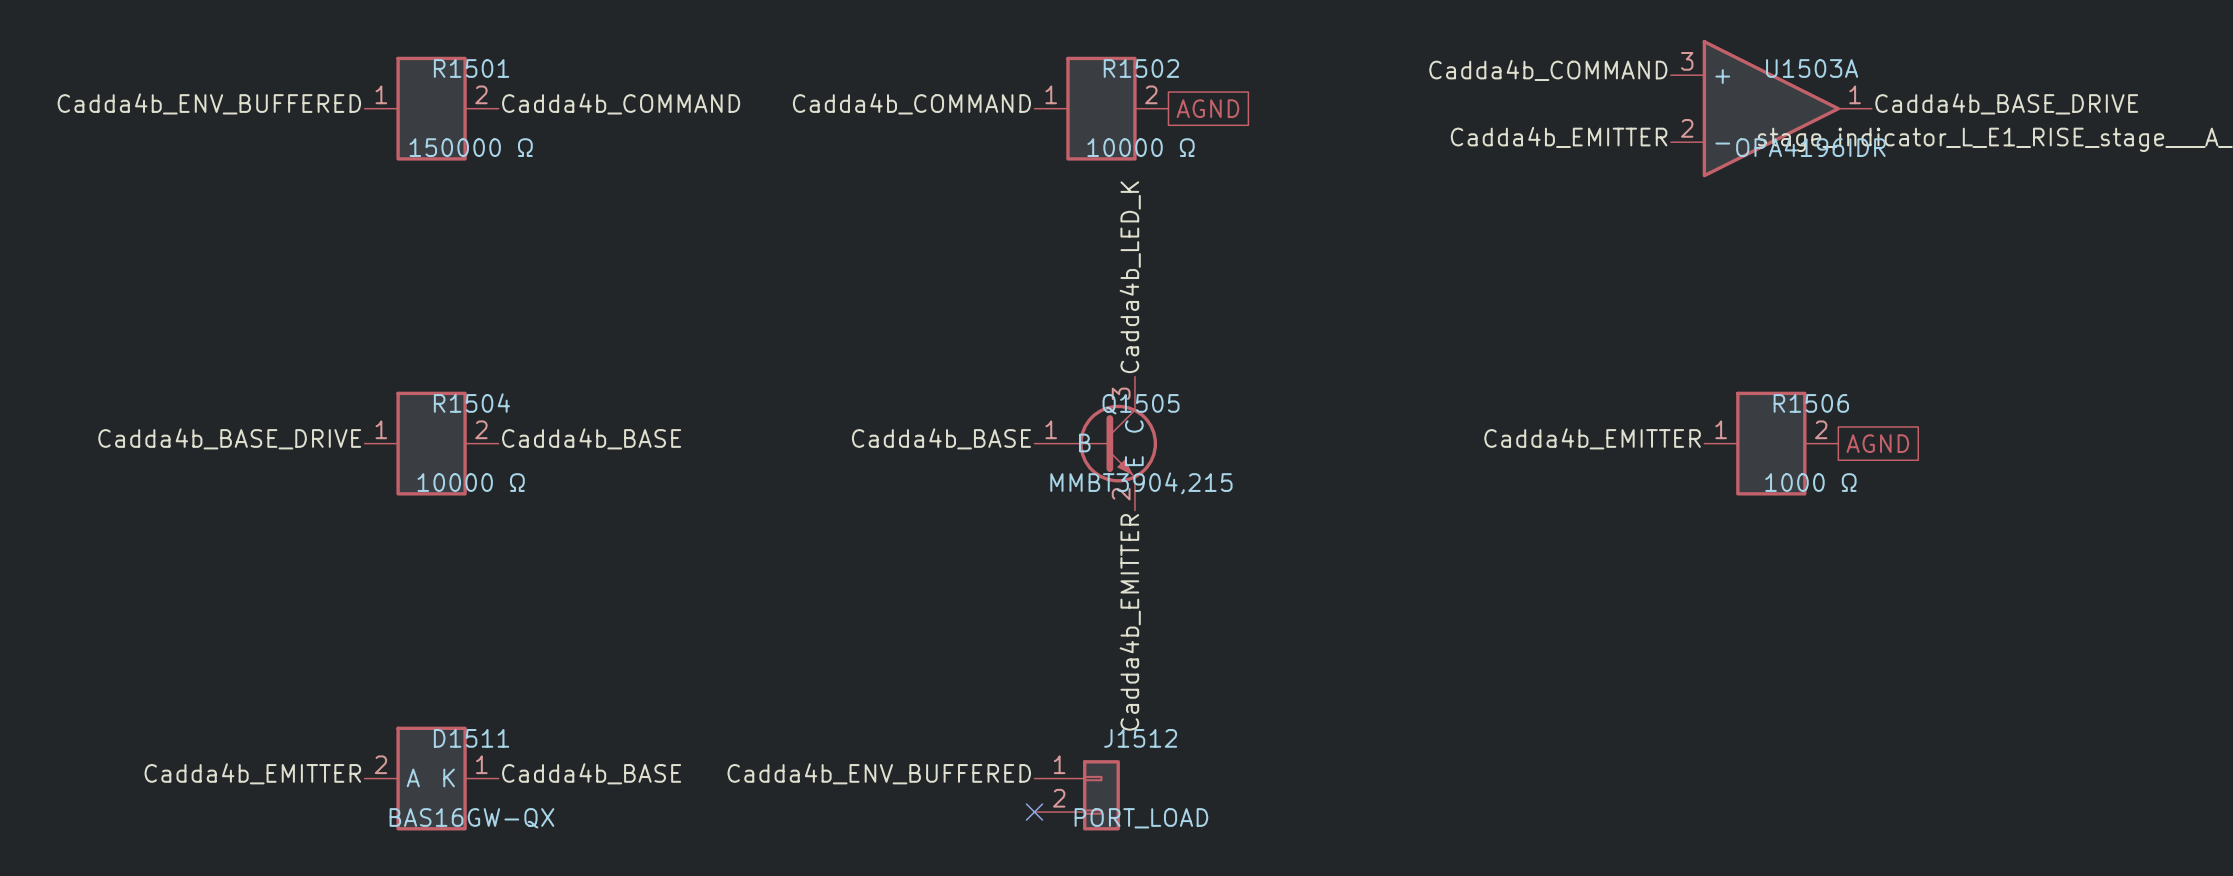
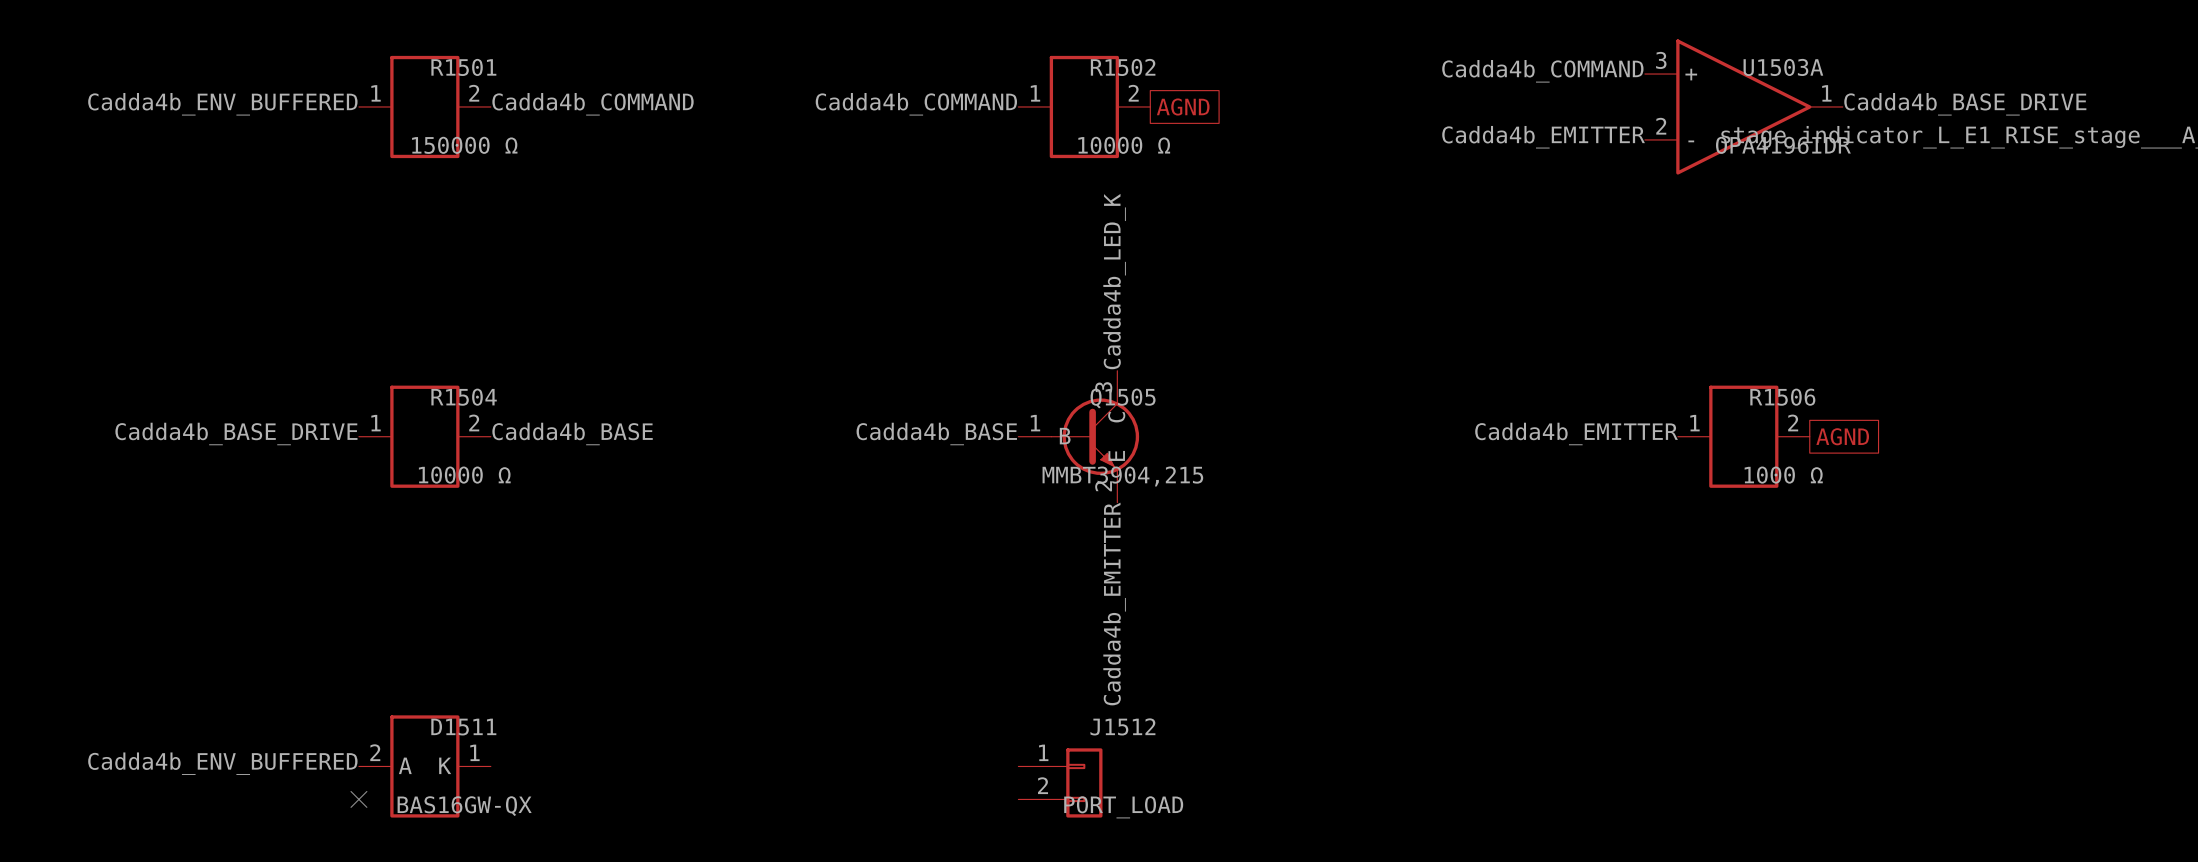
label: Cadda4b_EMITTER (252, 773) -> Cadda4b_ENV_BUFFERED (222, 763)
label: Cadda4b_BASE (591, 773) -> none
label: Cadda4b_ENV_BUFFERED (879, 773) -> none
no-connect mark: none -> (358, 799)
no-connect mark: (1034, 812) -> none

